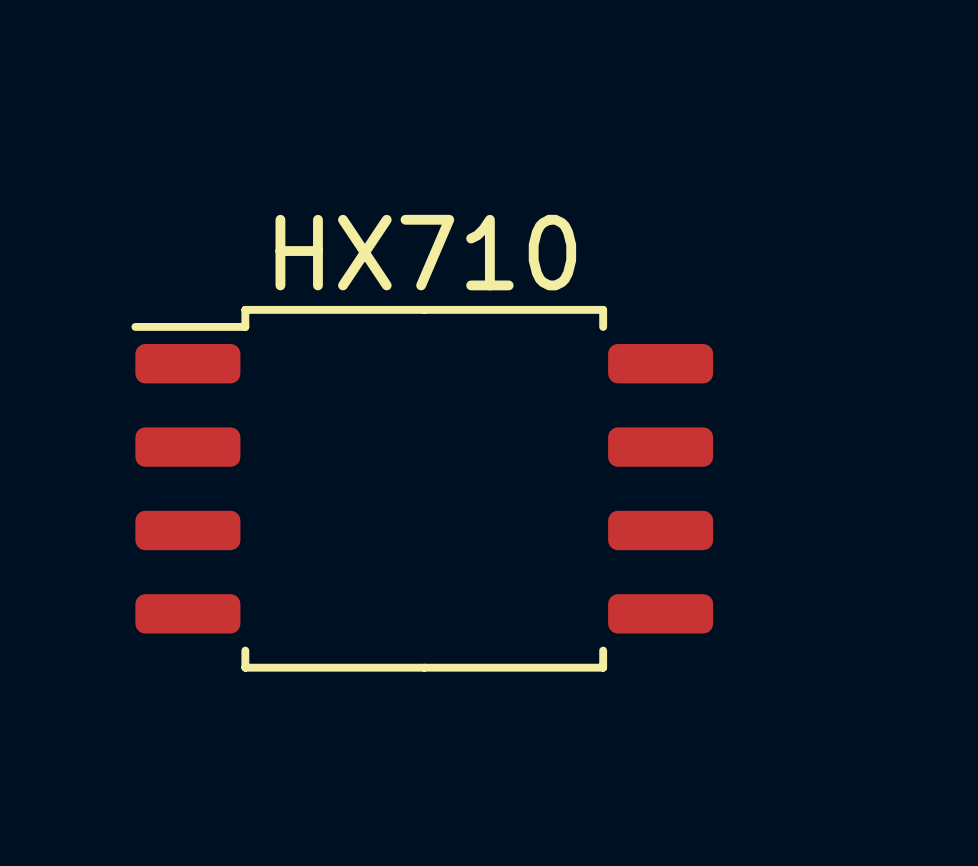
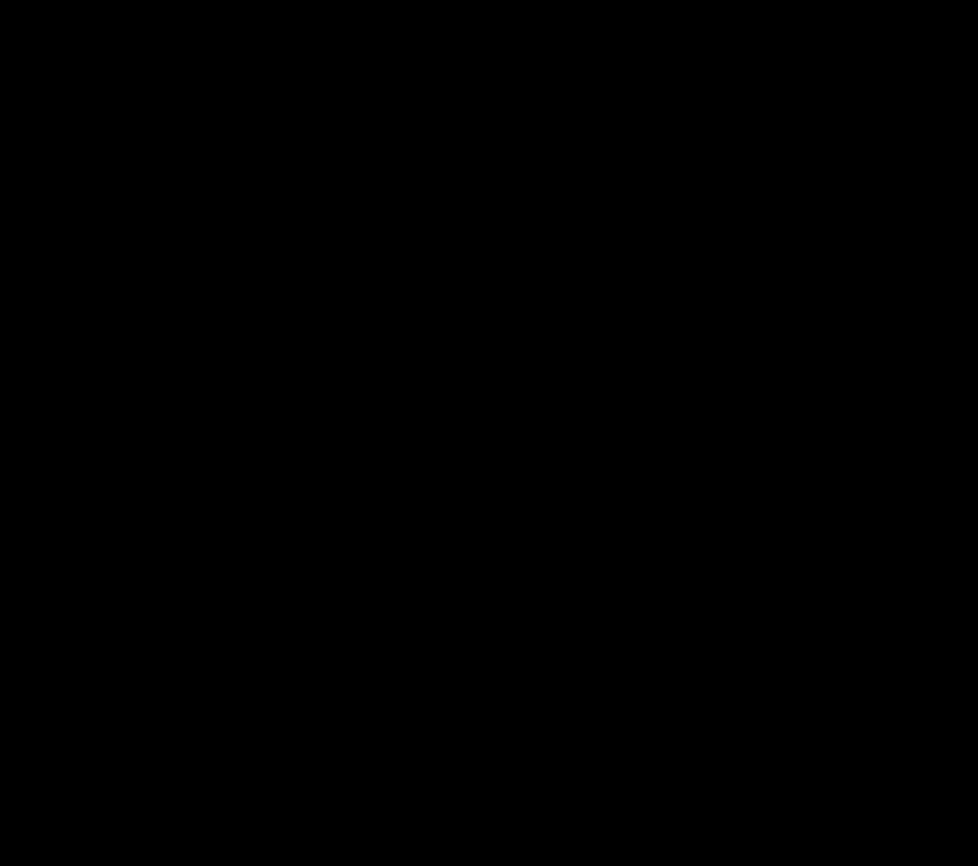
HX710: (422, 488) -> none

